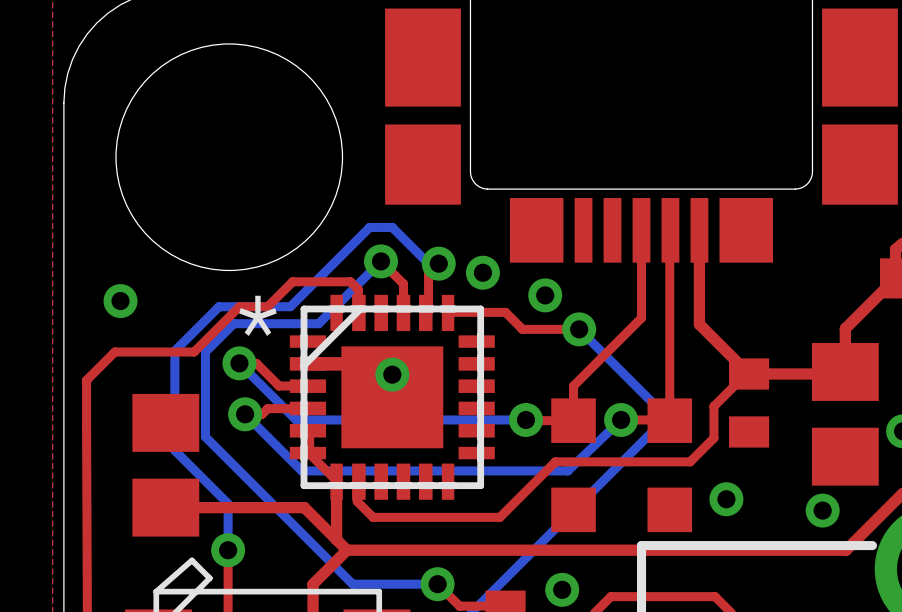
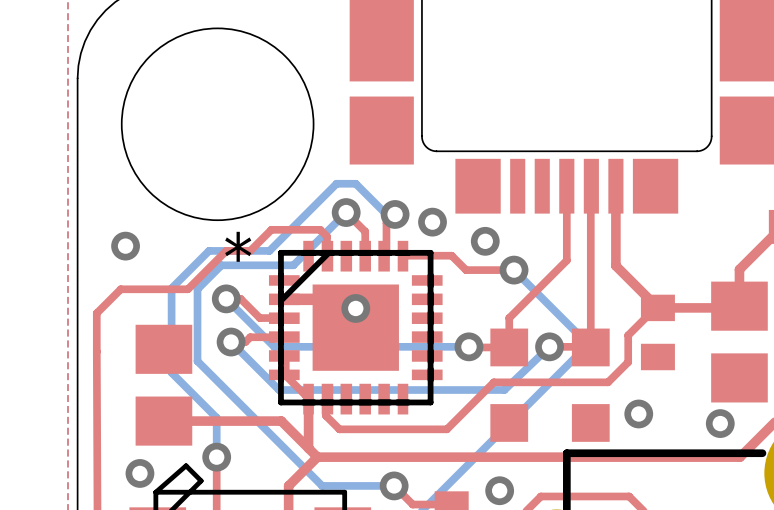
via: none -> (139, 473)

